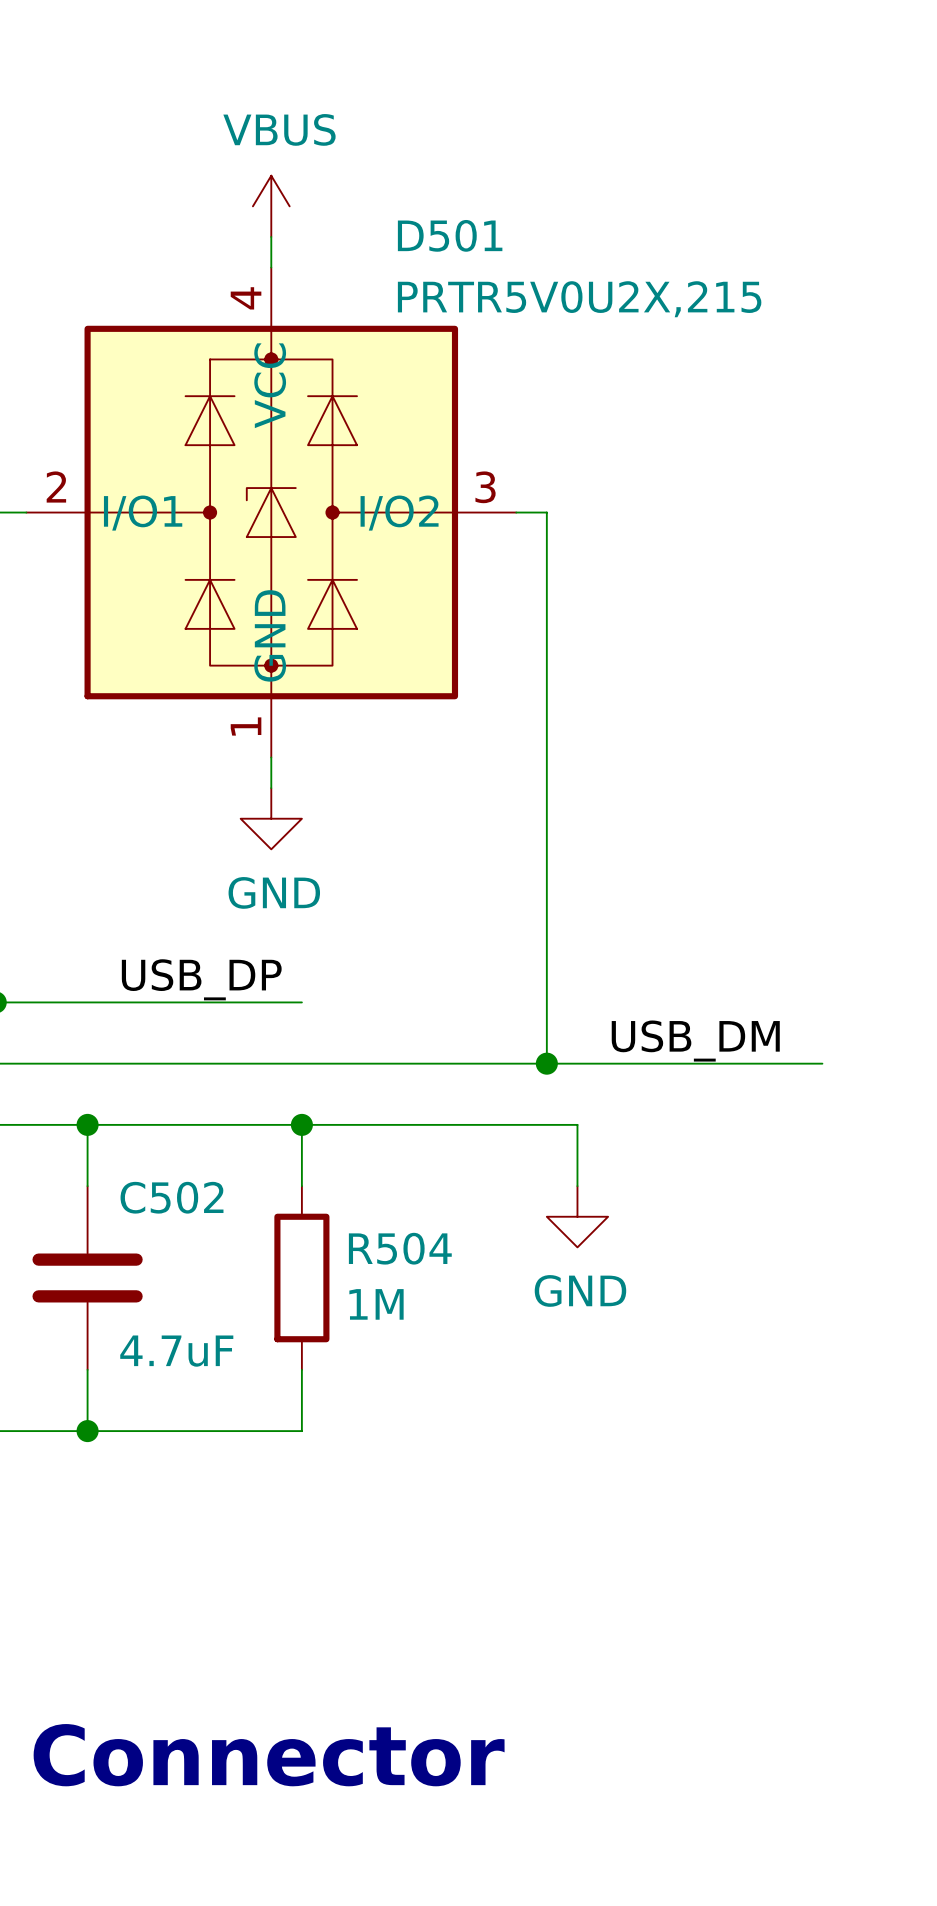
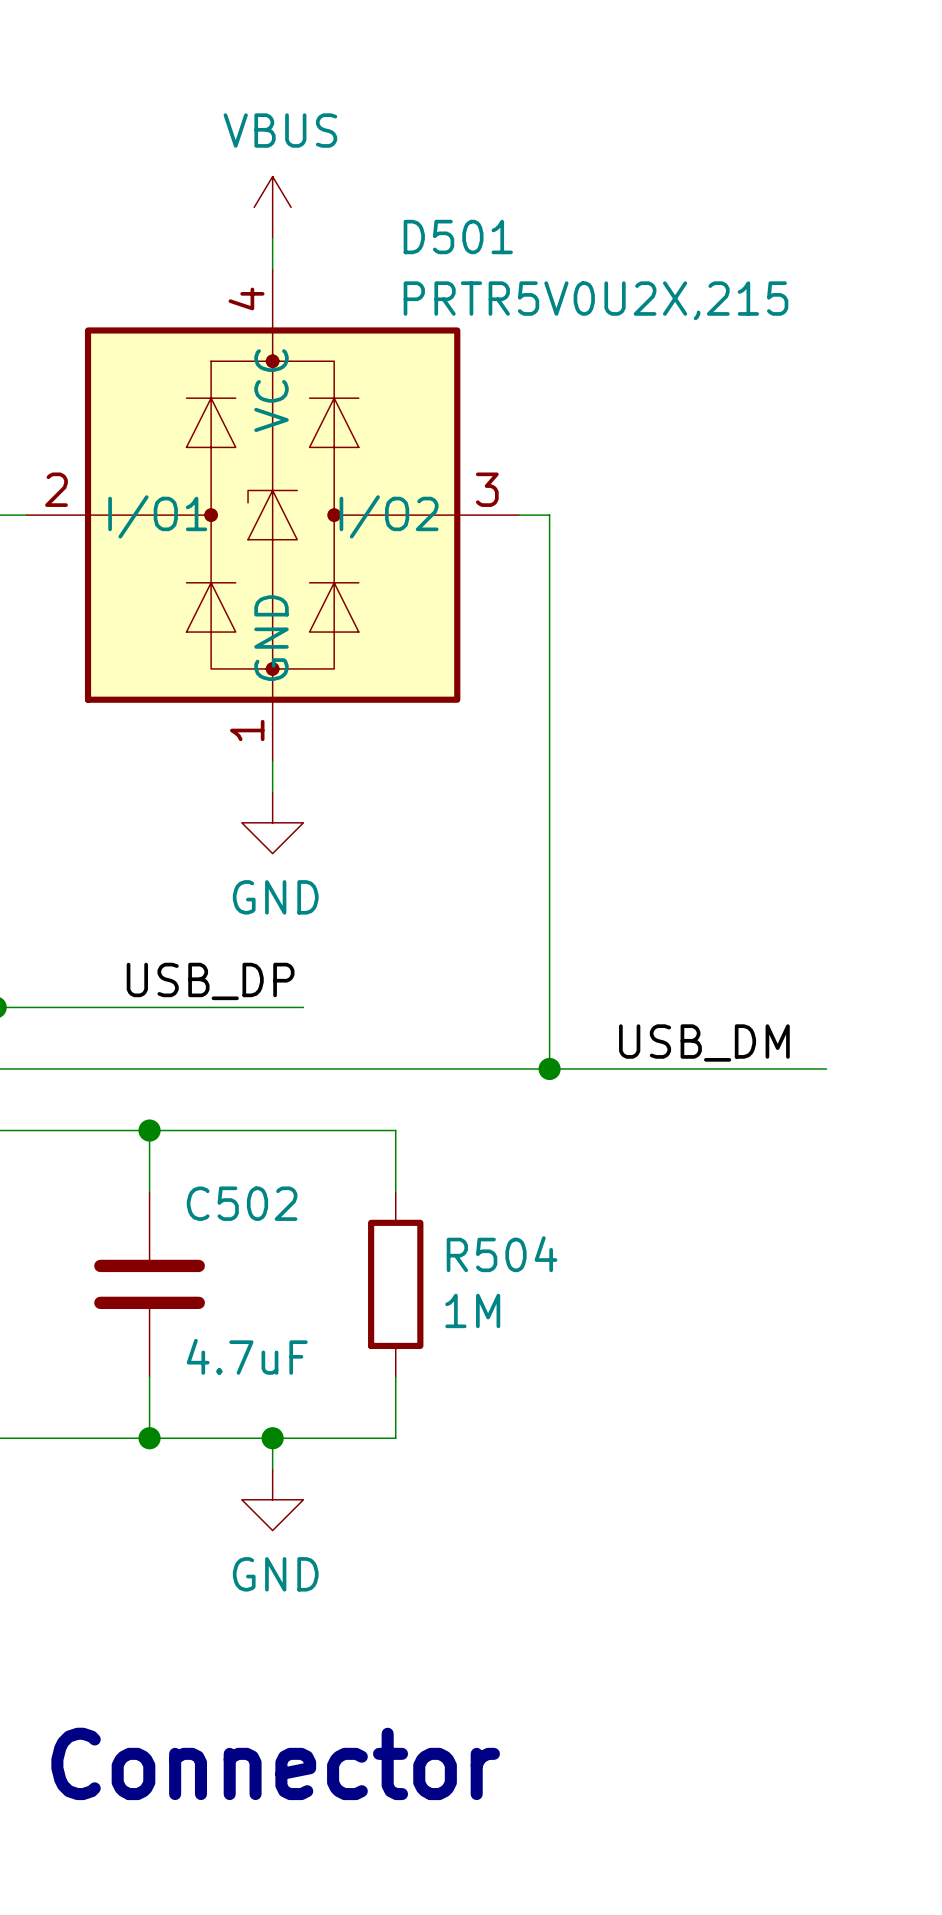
wire: (87, 1124) (87, 1186) -> (149, 1130) (149, 1192)
junction position: (87, 1124) -> (149, 1130)
wire: (301, 1124) (301, 1186) -> none
junction: (301, 1124) -> none
wire: (393, 1124) (577, 1124) (577, 1186) -> (395, 1130) (395, 1192)
power symbol position: GND (577, 1216) -> GND (272, 1499)
C502 position: (87, 1277) -> (149, 1284)
R504 position: (301, 1277) -> (395, 1284)
wire: (87, 1369) (87, 1431) -> (149, 1376) (149, 1438)
wire: (301, 1369) (301, 1431) -> (395, 1376) (395, 1438) (303, 1438)
junction position: (87, 1431) -> (149, 1438)
wire: none -> (272, 1438) (272, 1469)
junction: none -> (272, 1438)

